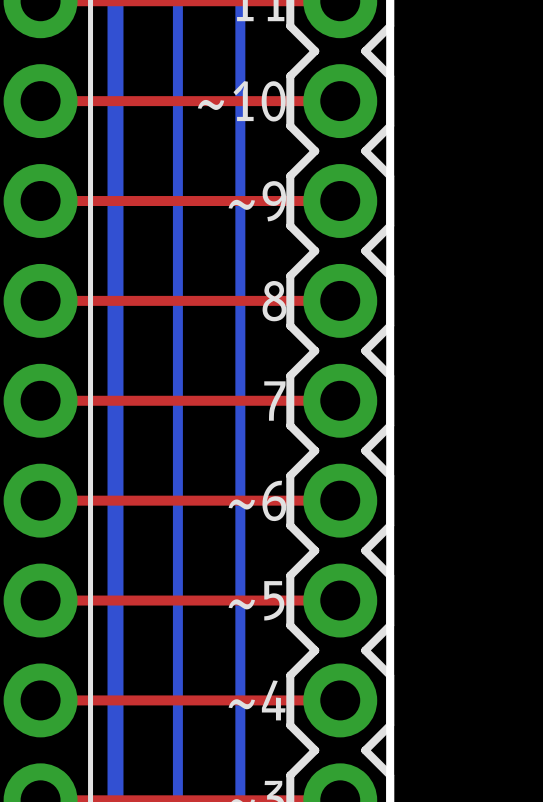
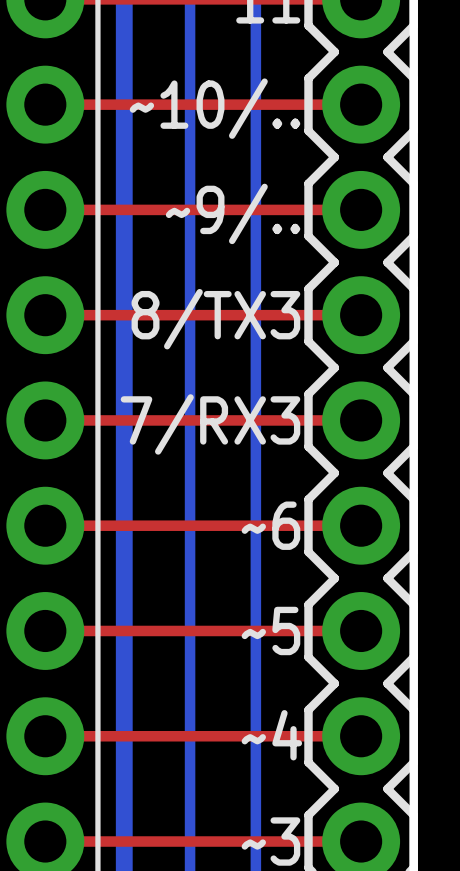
text: ~10 (241, 101) -> ~10/.. (215, 108)
text: ~9 (257, 201) -> ~9/.. (233, 213)
text: 8 (274, 301) -> 8/TX3 (215, 319)
text: 7 (274, 401) -> 7/RX3 (210, 424)

